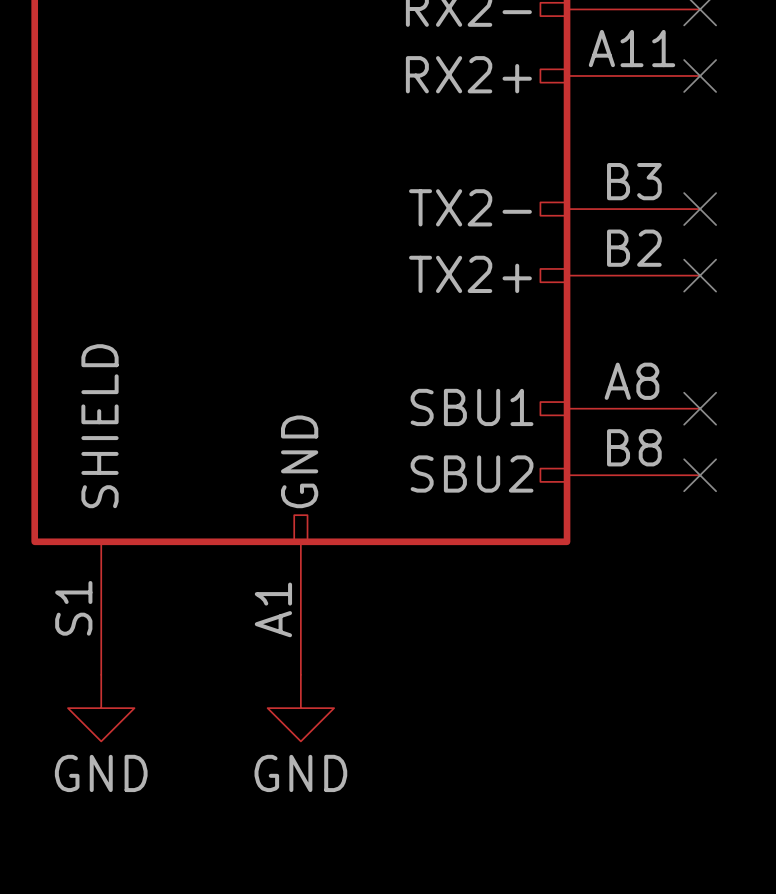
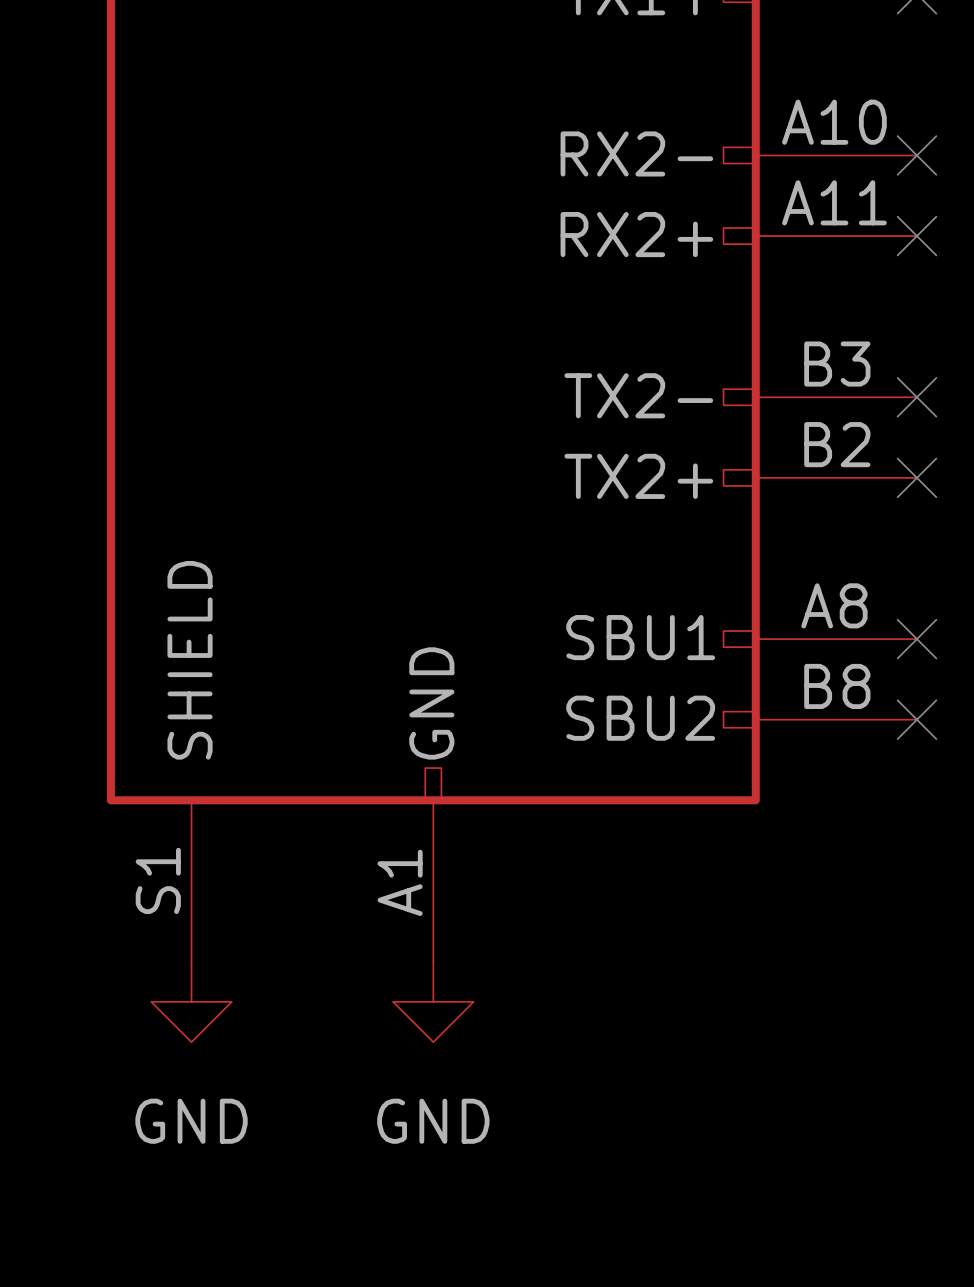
power symbol text position: GND (101, 773) -> GND (191, 1121)
power symbol text position: GND (300, 773) -> GND (433, 1121)

